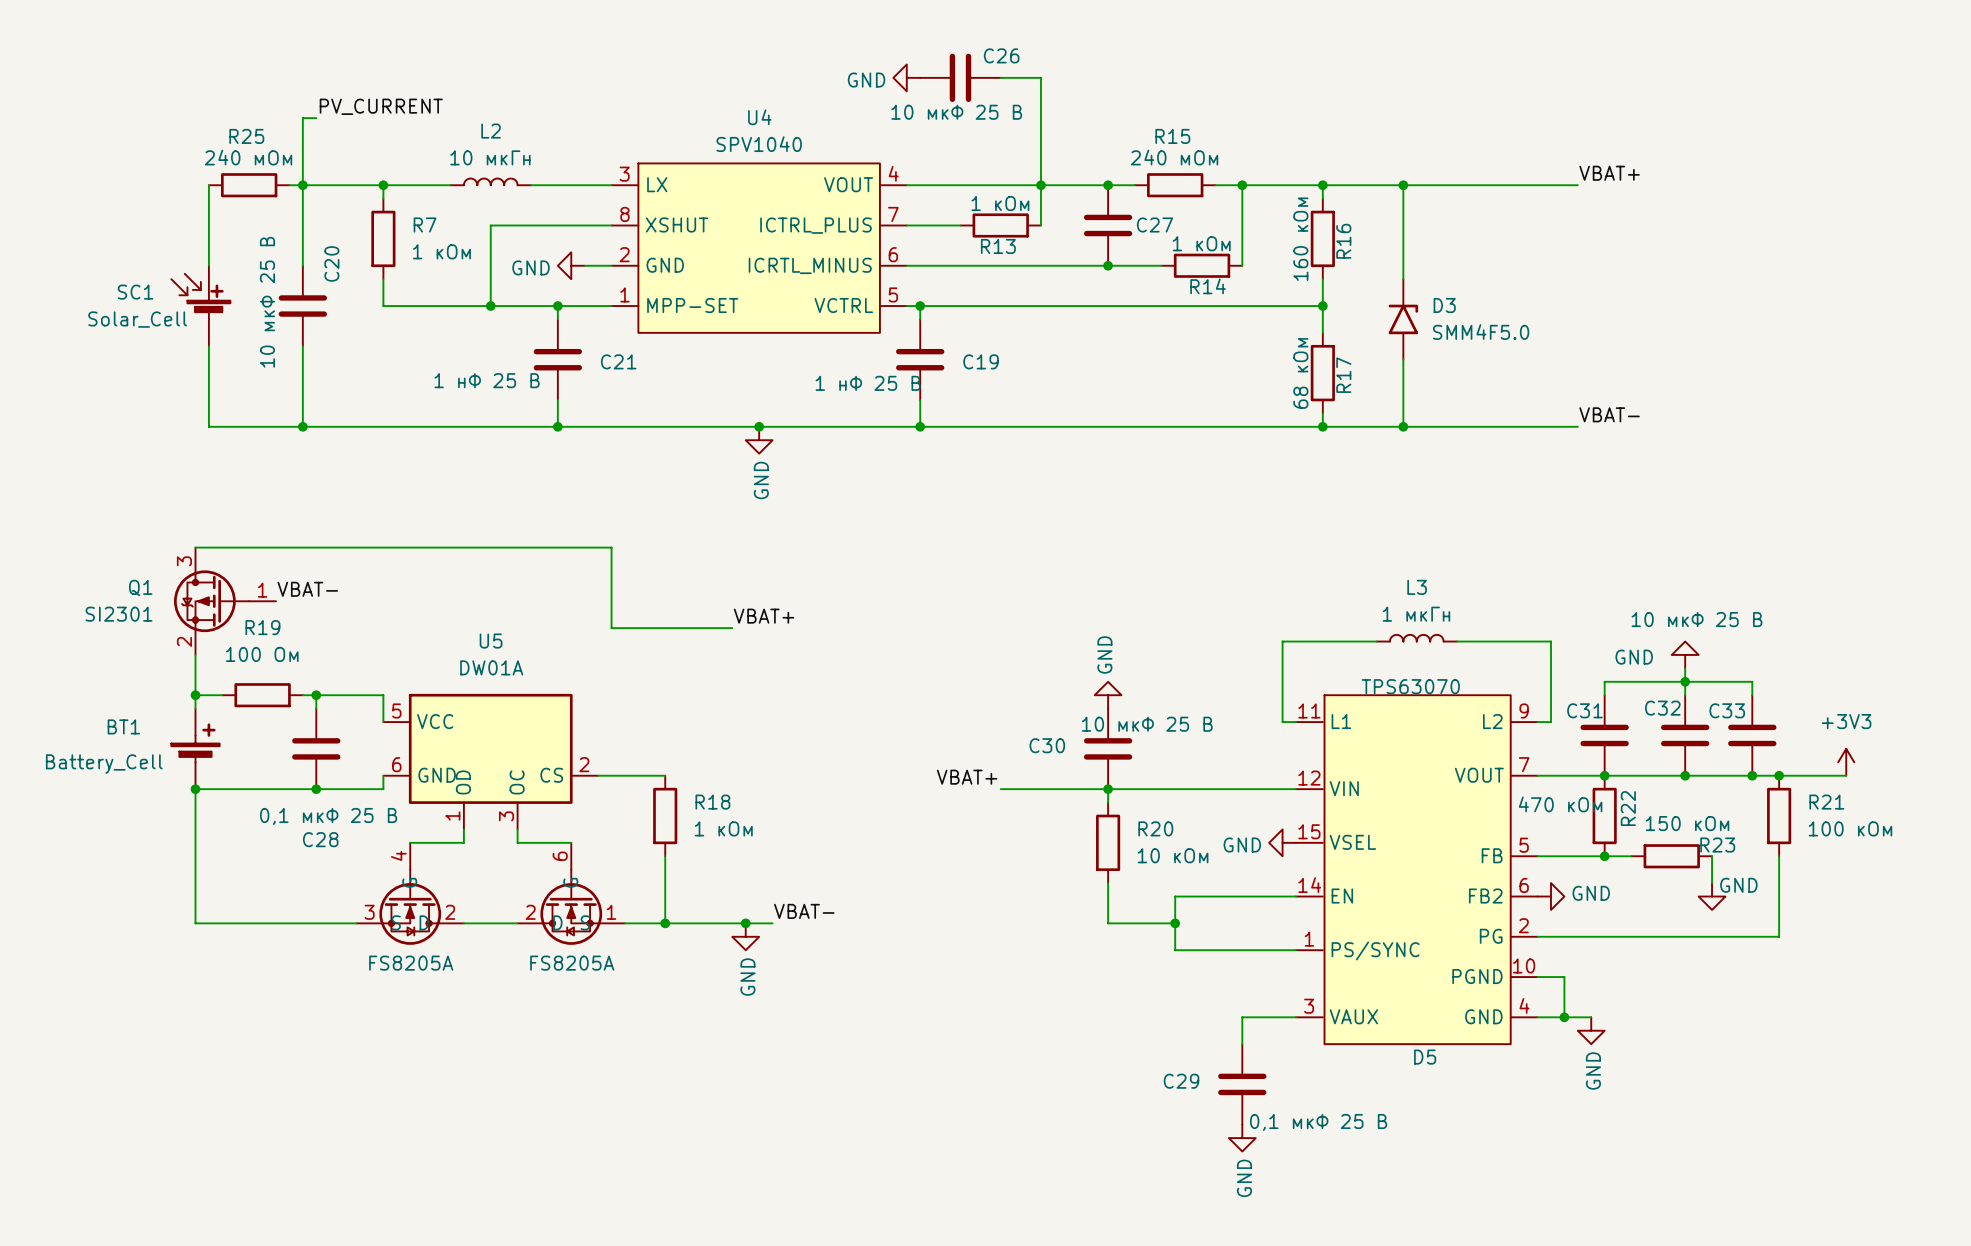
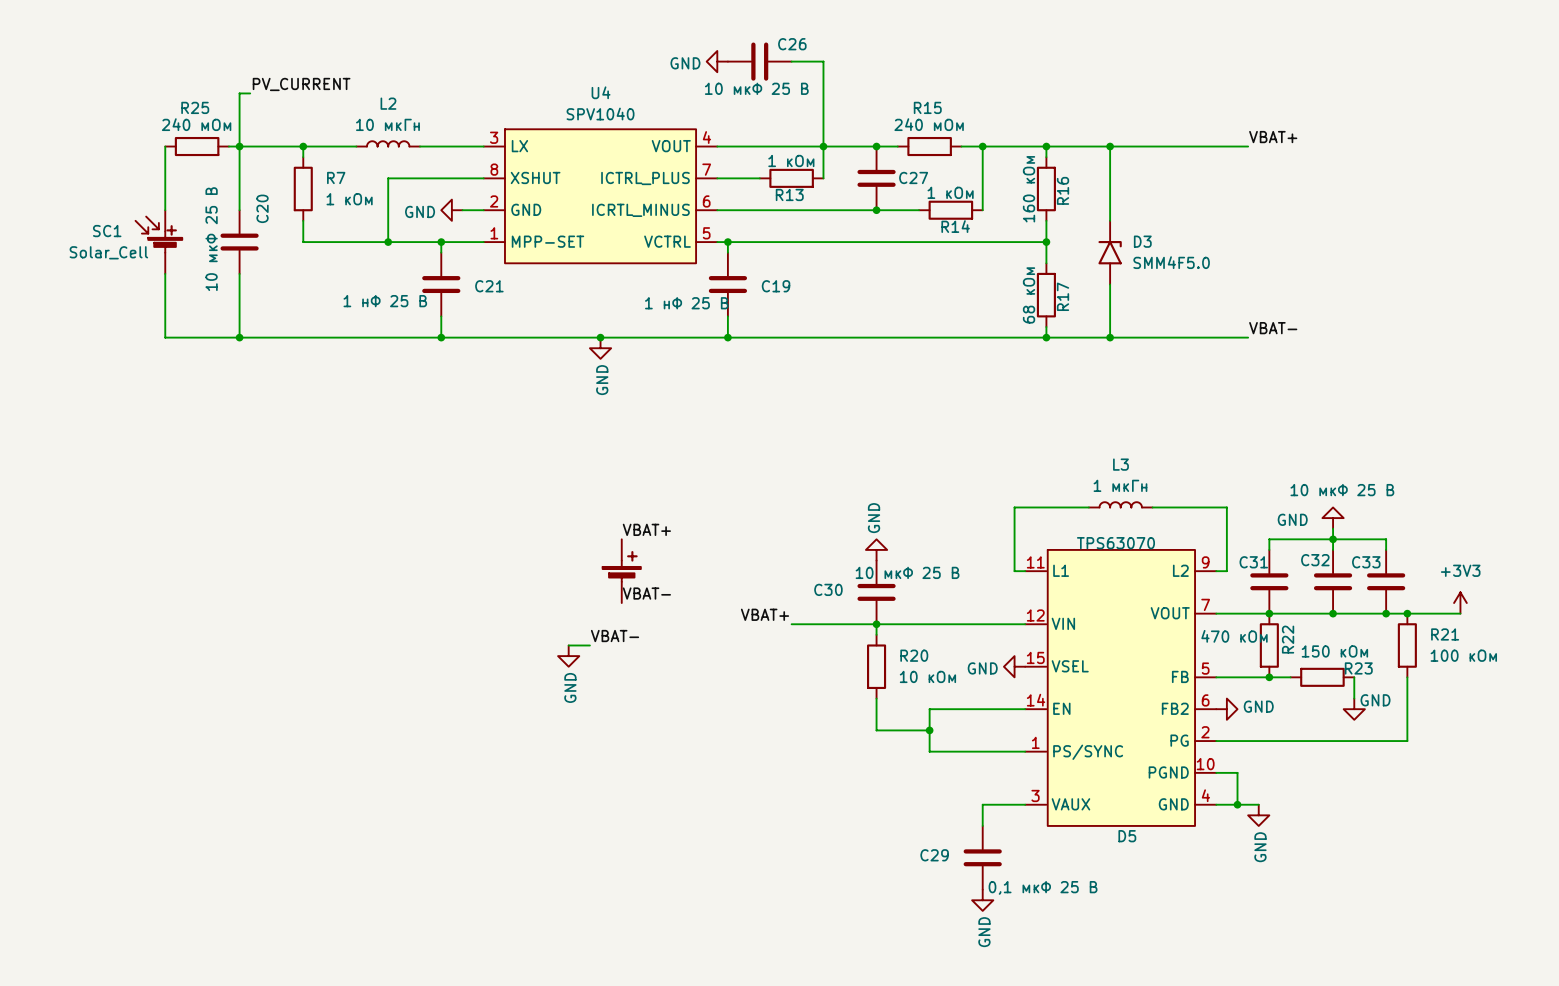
wire: (195, 547) (611, 547) (611, 628) (732, 628) -> none
label: VBAT- (307, 589) -> none
Q1: SI2301 (225, 601) -> none
label position: VBAT+ (764, 616) -> VBAT+ (646, 529)
wire: (195, 654) (195, 708) -> none
wire: (195, 695) (222, 695) -> none
junction: (195, 695) -> none
R19: 100 Ом (262, 695) -> none
wire: (302, 695) (383, 695) (383, 722) -> none
wire: (316, 695) (316, 708) -> none
junction: (316, 695) -> none
part: none -> (621, 571)
BT1: Battery_Cell (195, 748) -> none
C28: 0,1 мкФ 25 В (316, 748) -> none
label: none -> VBAT- (646, 593)
U5: DW01A (490, 761) -> none
wire: (383, 775) (383, 789) (195, 789) (195, 923) (356, 923) -> none
wire: (598, 775) (665, 775) -> none
junction: (195, 789) -> none
junction: (316, 789) -> none
label: none -> VBAT- (615, 636)
R18: 1 кОм (665, 816) -> none
wire: none -> (568, 645) (589, 645)
wire: (463, 829) (463, 842) (410, 842) -> none
wire: (517, 829) (517, 842) (571, 842) -> none
wire: (665, 856) (665, 923) -> none
part: FS8205A (410, 893) -> none
part: FS8205A (571, 893) -> none
label: VBAT- (804, 911) -> none
wire: (463, 923) (517, 923) -> none
wire: (624, 923) (772, 923) -> none
junction: (665, 923) -> none
junction: (745, 923) -> none
power symbol position: GND (745, 936) -> GND (568, 656)

